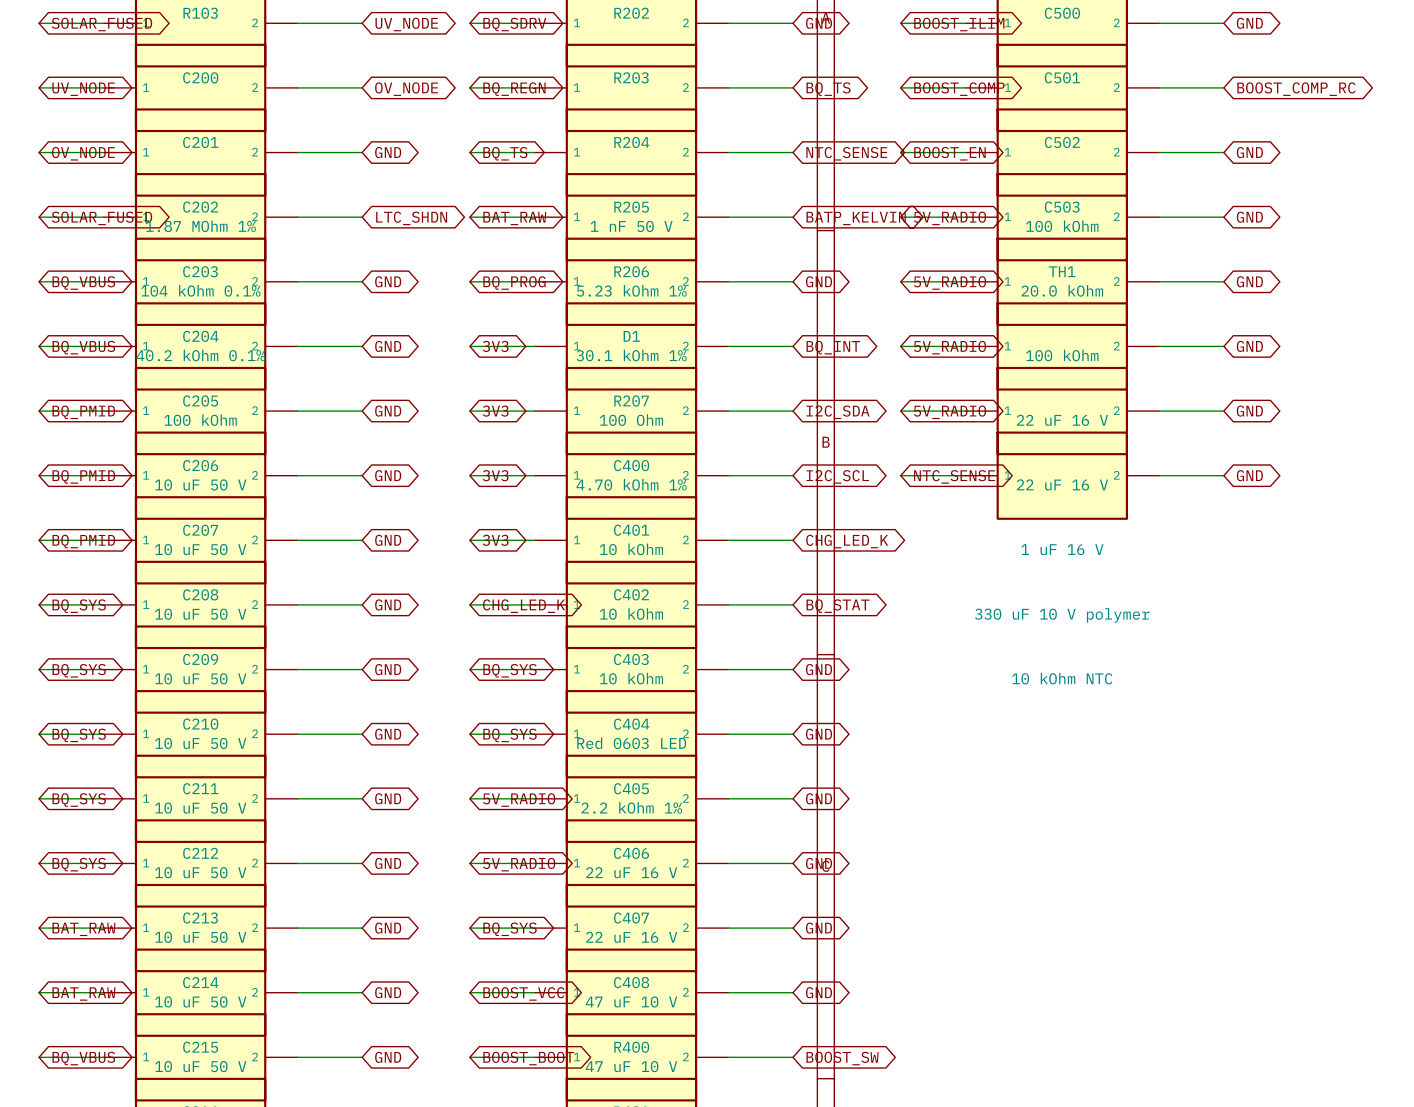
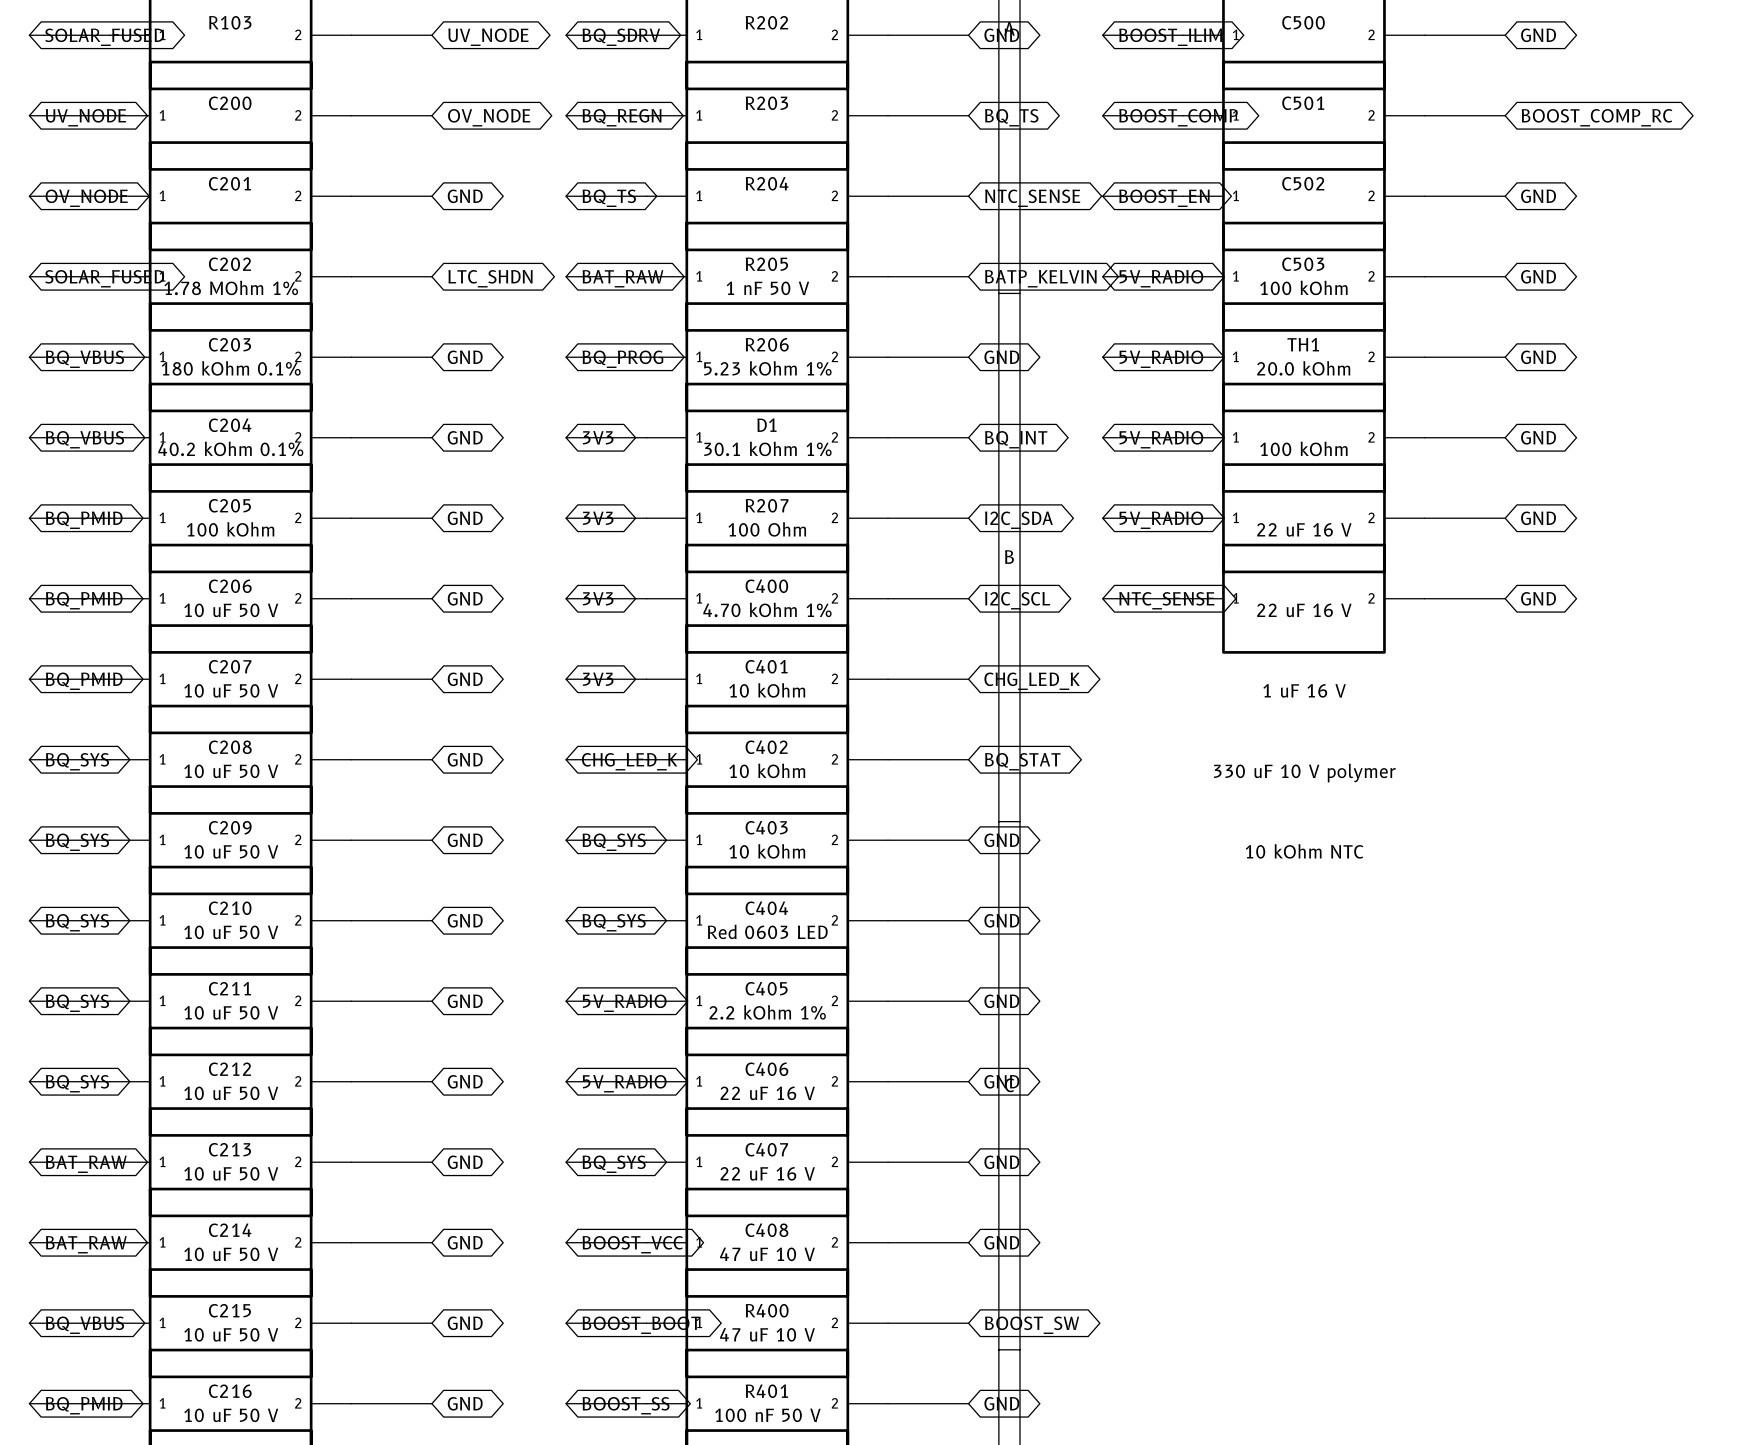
part value: 1.87 MOhm 1% (200, 226) -> 1.78 MOhm 1% (231, 287)
part value: 104 kOhm 0.1% (200, 290) -> 180 kOhm 0.1% (231, 368)

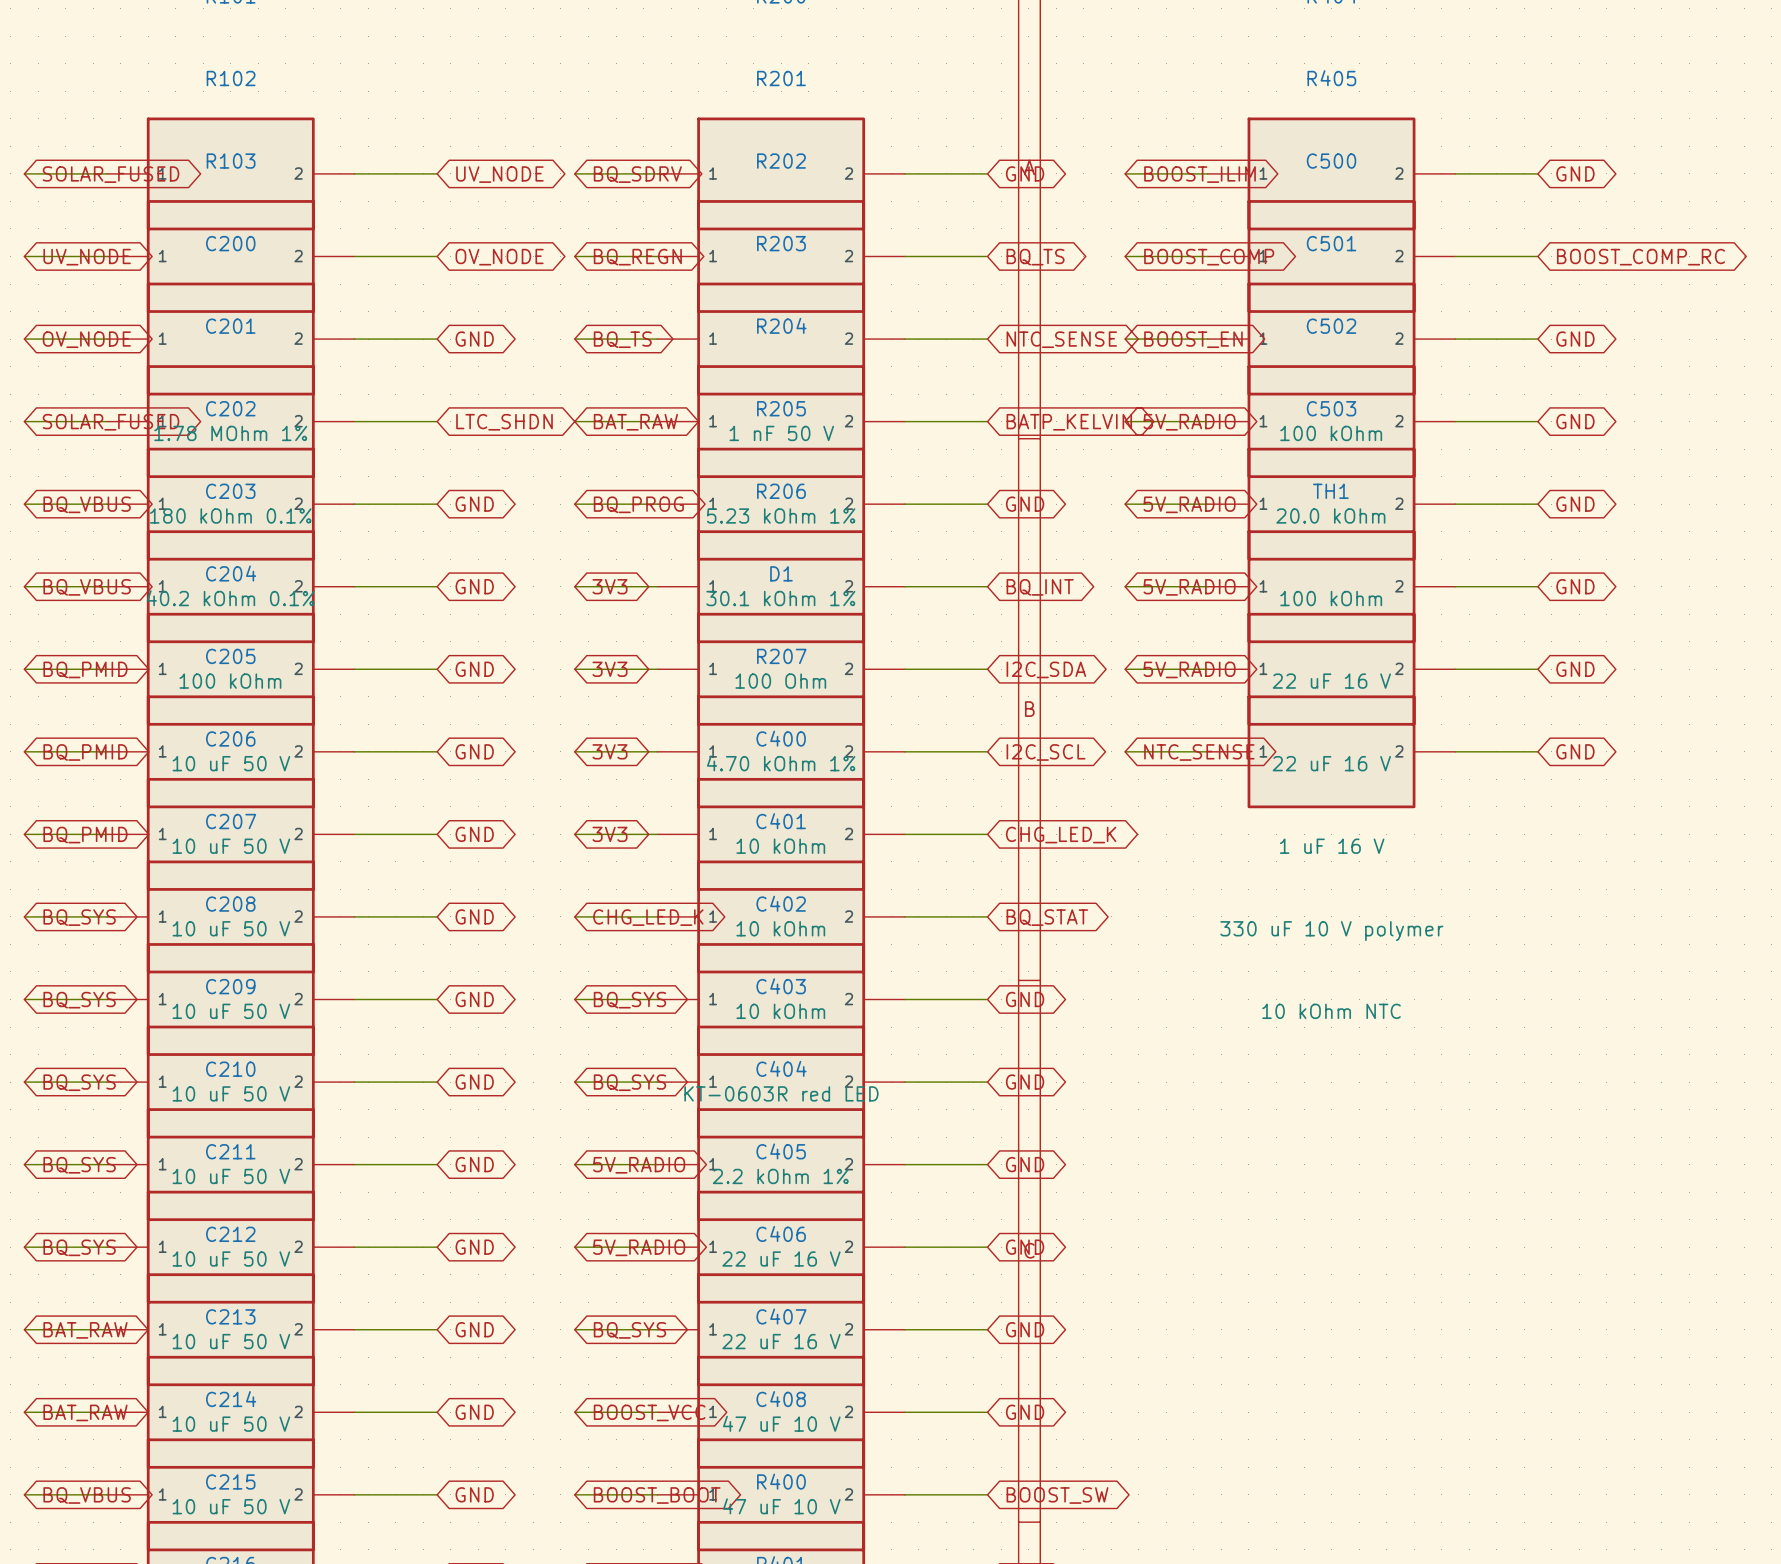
D1 value: Red 0603 LED (767, 931) -> KT-0603R red LED (781, 1093)

